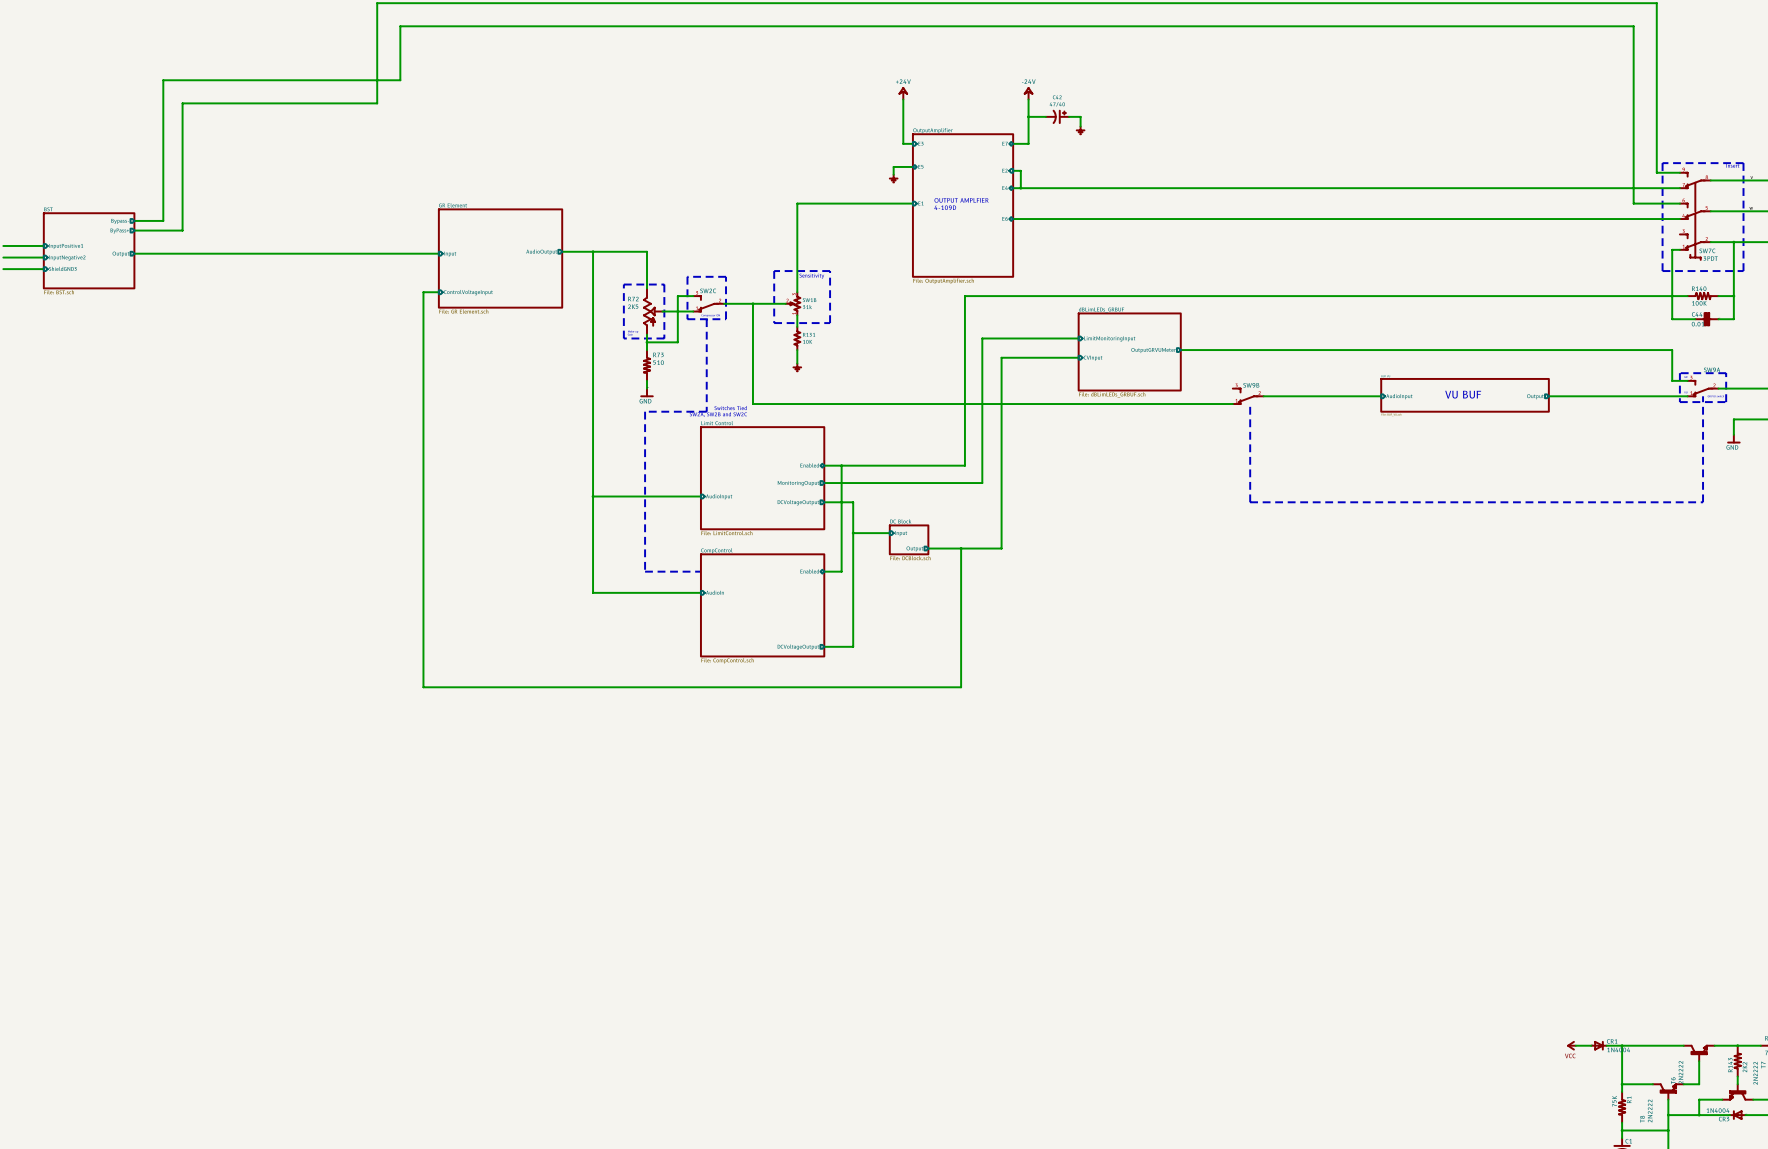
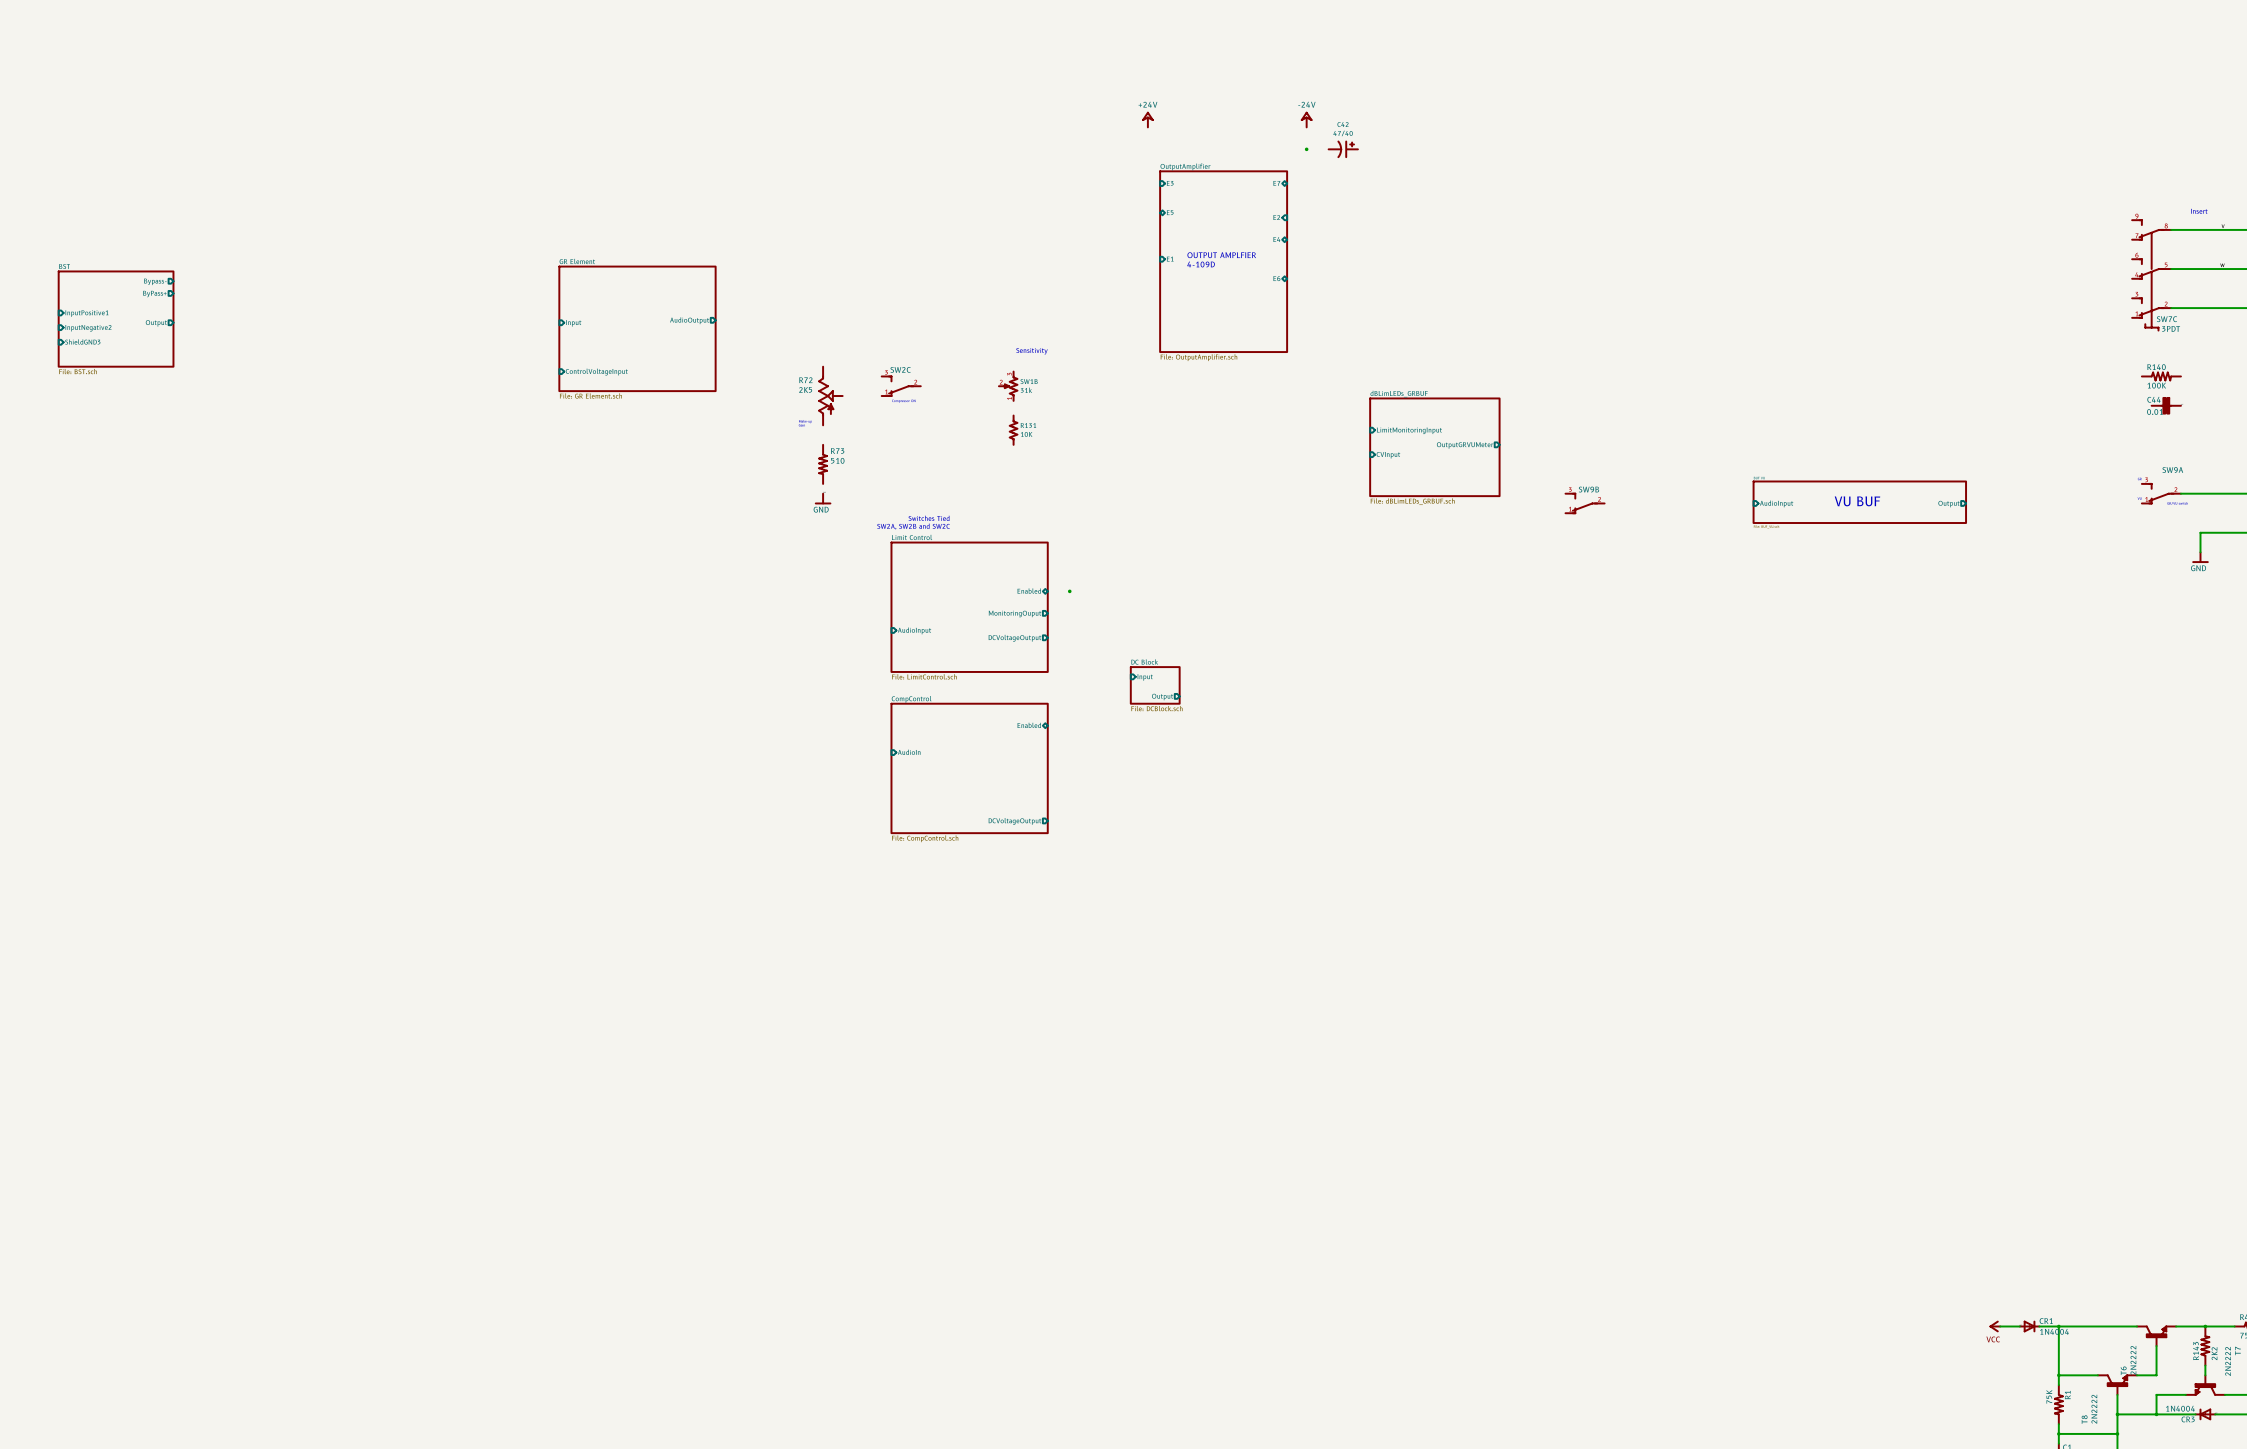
wire: (903, 99) (903, 143) (912, 143) -> none
wire: (1028, 99) (1028, 143) (1013, 143) -> none
wire: (1028, 116) (1045, 116) -> none
wire: (1069, 116) (1080, 116) (1080, 126) -> none
power symbol: (1080, 130) -> none
line: (1662, 163) (1743, 163) (1743, 271) (1662, 271) (1662, 163) -> none
wire: (912, 166) (893, 166) (893, 174) -> none
wire: (1013, 170) (1020, 170) (1020, 188) -> none
wire: (1679, 172) (1656, 172) (1656, 3) (377, 3) (377, 103) (182, 103) (182, 230) (134, 230) -> none
power symbol: (893, 178) -> none
wire: (1013, 188) (1679, 188) -> none
wire: (912, 203) (797, 203) (797, 292) -> none
wire: (1679, 203) (1633, 203) (1633, 26) (400, 26) (400, 80) (163, 80) (163, 220) (134, 220) -> none
wire: (1013, 219) (1679, 219) -> none
wire: (1733, 242) (1733, 319) (1718, 319) -> none
wire: (3, 245) (43, 245) -> none
wire: (1679, 249) (1672, 249) (1672, 319) (1695, 319) -> none
wire: (562, 251) (647, 251) (647, 288) -> none
wire: (593, 251) (593, 592) (700, 592) -> none
wire: (134, 253) (438, 253) -> none
wire: (3, 257) (43, 257) -> none
wire: (3, 269) (43, 269) -> none
line: (774, 271) (830, 271) (830, 323) (774, 323) (774, 271) -> none
line: (687, 276) (687, 319) (726, 319) (726, 276) (687, 276) -> none
line: (623, 284) (664, 284) (664, 338) (623, 338) (623, 284) -> none
wire: (438, 292) (423, 292) (423, 687) (961, 687) (961, 548) -> none
wire: (693, 296) (677, 296) (677, 342) (647, 342) -> none
wire: (1687, 296) (964, 296) (964, 465) (824, 465) -> none
wire: (1718, 296) (1733, 296) -> none
wire: (724, 303) (785, 303) -> none
wire: (752, 303) (752, 404) (1232, 404) -> none
wire: (662, 311) (693, 311) -> none
wire: (797, 315) (797, 326) -> none
line: (706, 319) (706, 411) (645, 411) (645, 571) (700, 571) -> none
wire: (647, 334) (647, 350) -> none
wire: (1078, 338) (982, 338) (982, 483) (824, 483) -> none
wire: (797, 350) (797, 363) -> none
wire: (1180, 350) (1672, 350) (1672, 380) (1687, 380) -> none
wire: (1078, 357) (1001, 357) (1001, 548) (928, 548) -> none
power symbol: (797, 367) -> none
line: (1679, 373) (1679, 402) (1726, 402) (1726, 373) (1679, 373) -> none
wire: (647, 380) (647, 388) -> none
wire: (1263, 396) (1381, 396) -> none
wire: (1548, 396) (1687, 396) -> none
line: (1703, 396) (1703, 502) (1250, 502) (1250, 404) -> none
wire: (841, 465) (841, 571) (824, 571) -> none
wire: (593, 496) (700, 496) -> none
wire: (824, 502) (853, 502) (853, 646) (824, 646) -> none
wire: (853, 533) (889, 533) -> none

